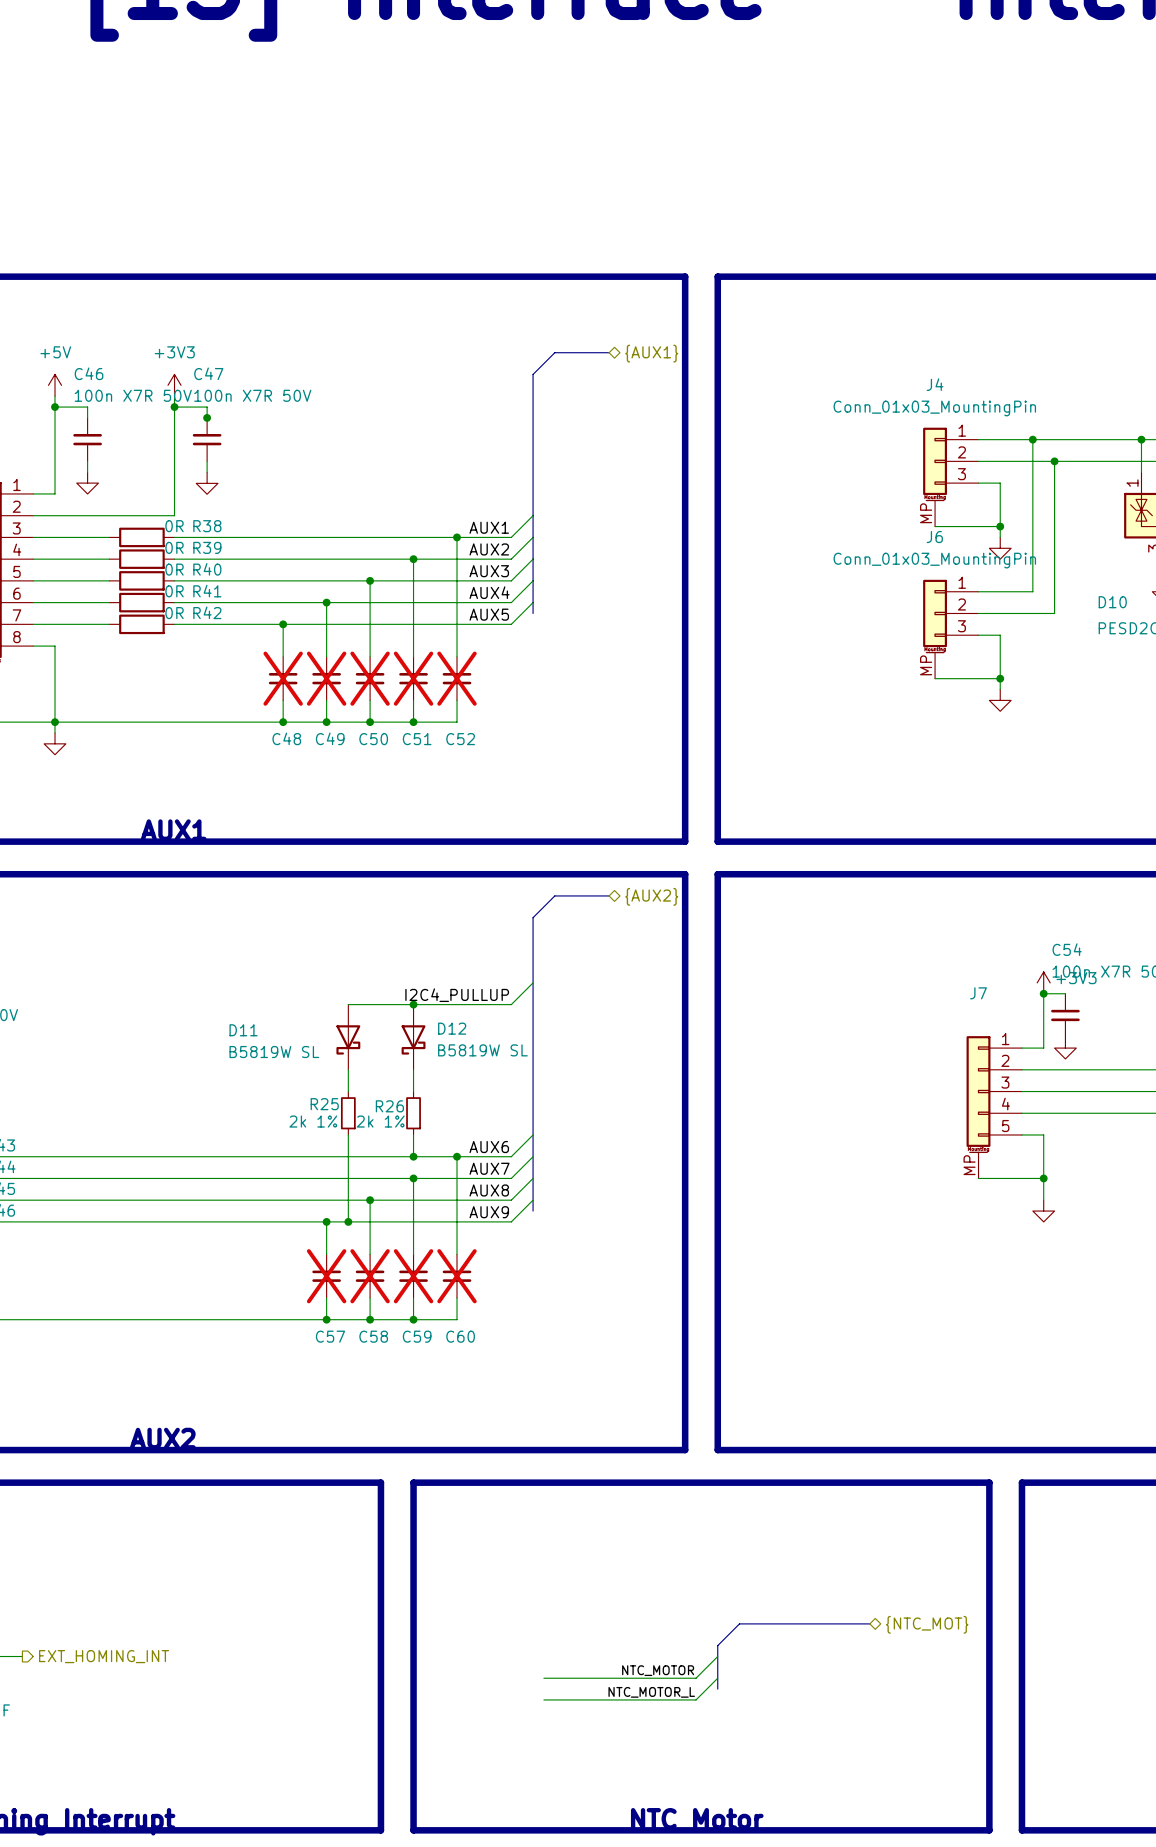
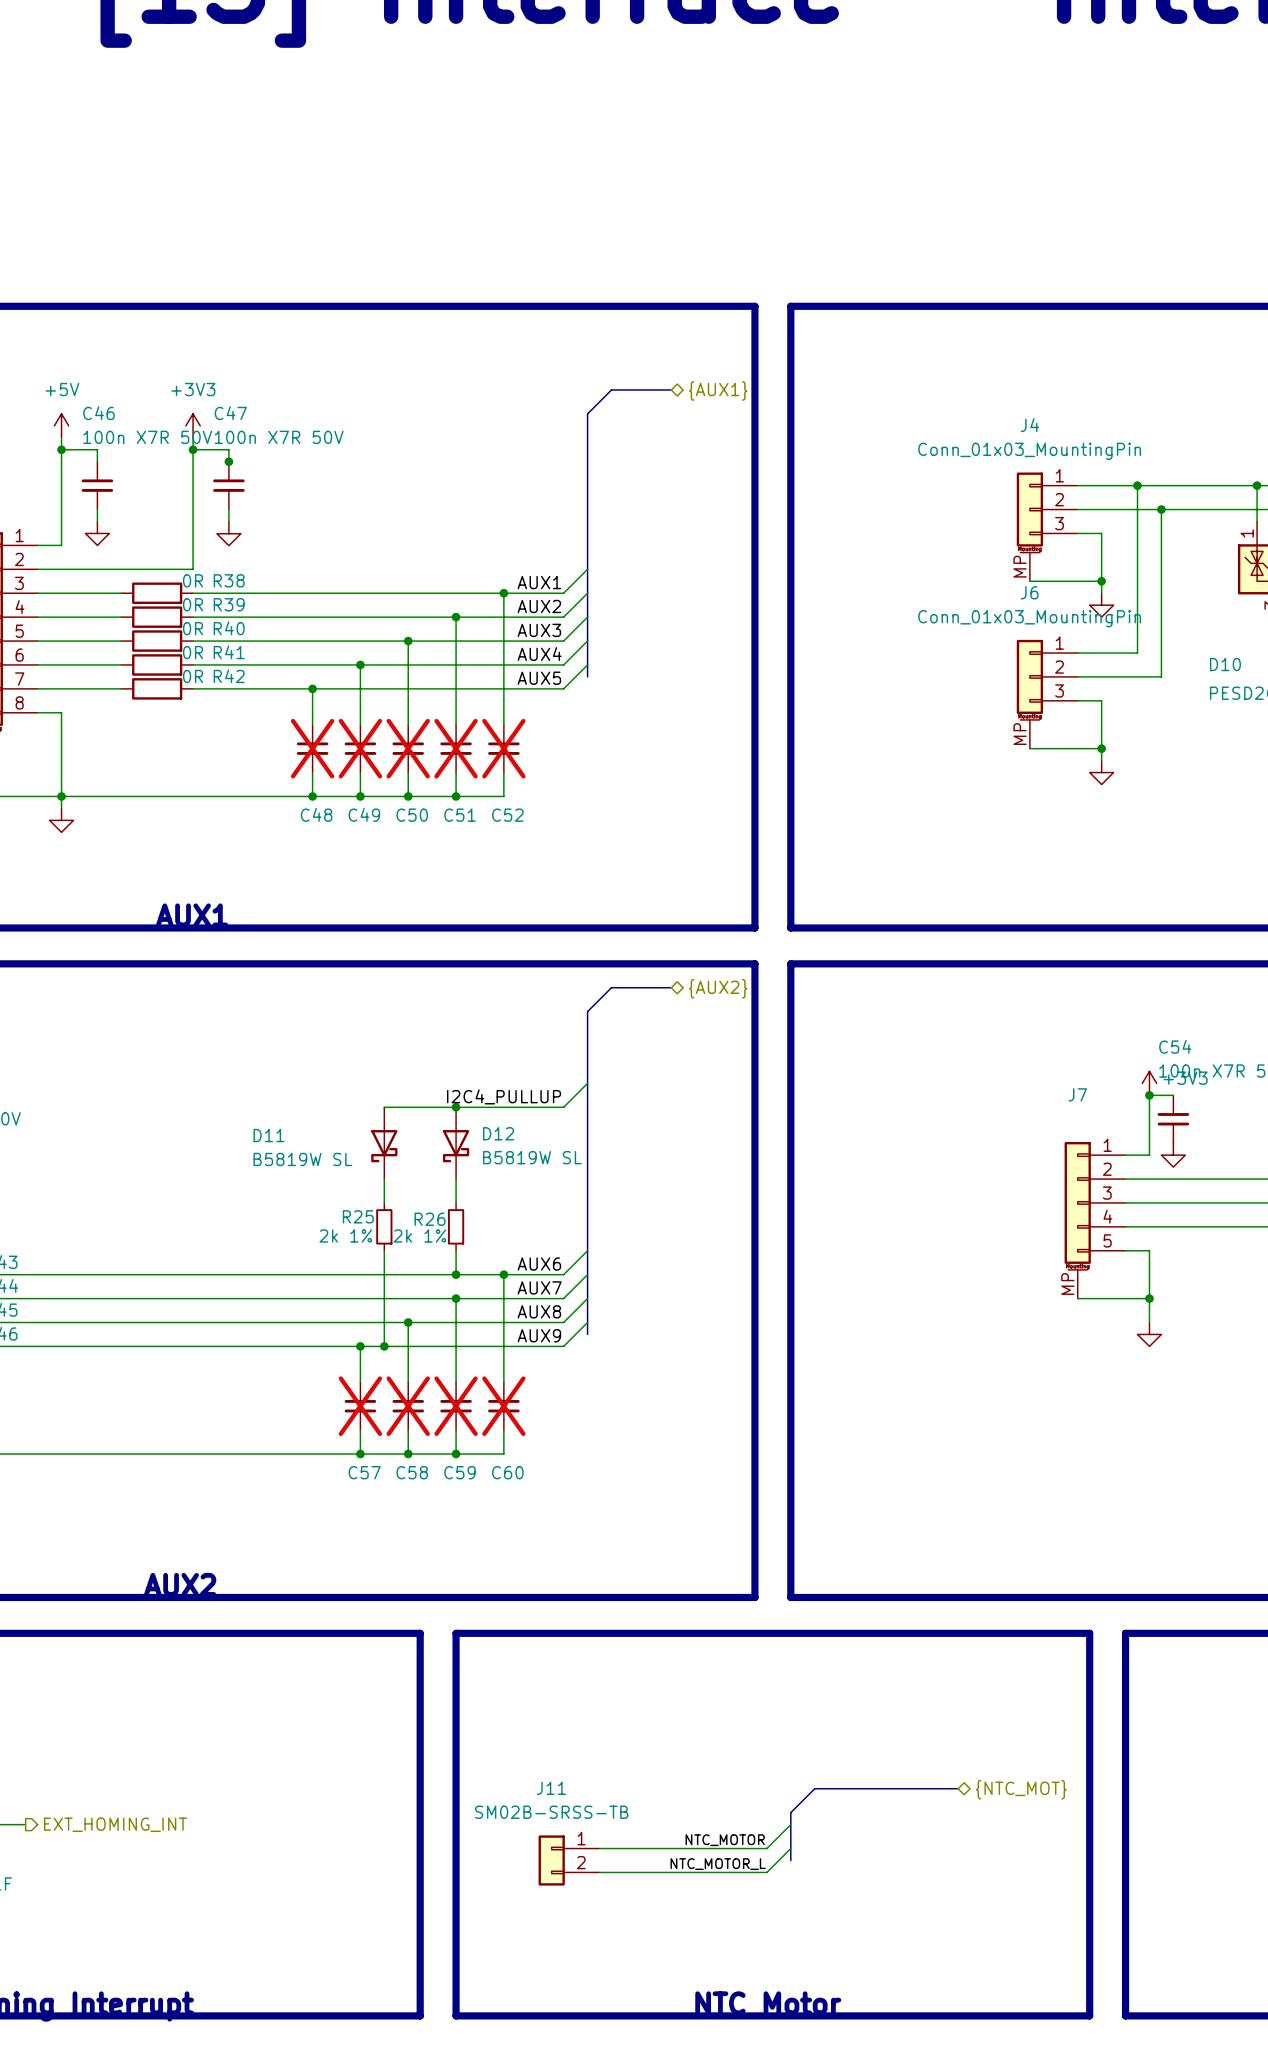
J11: none -> SM02B-SRSS-TB (569, 1860)

